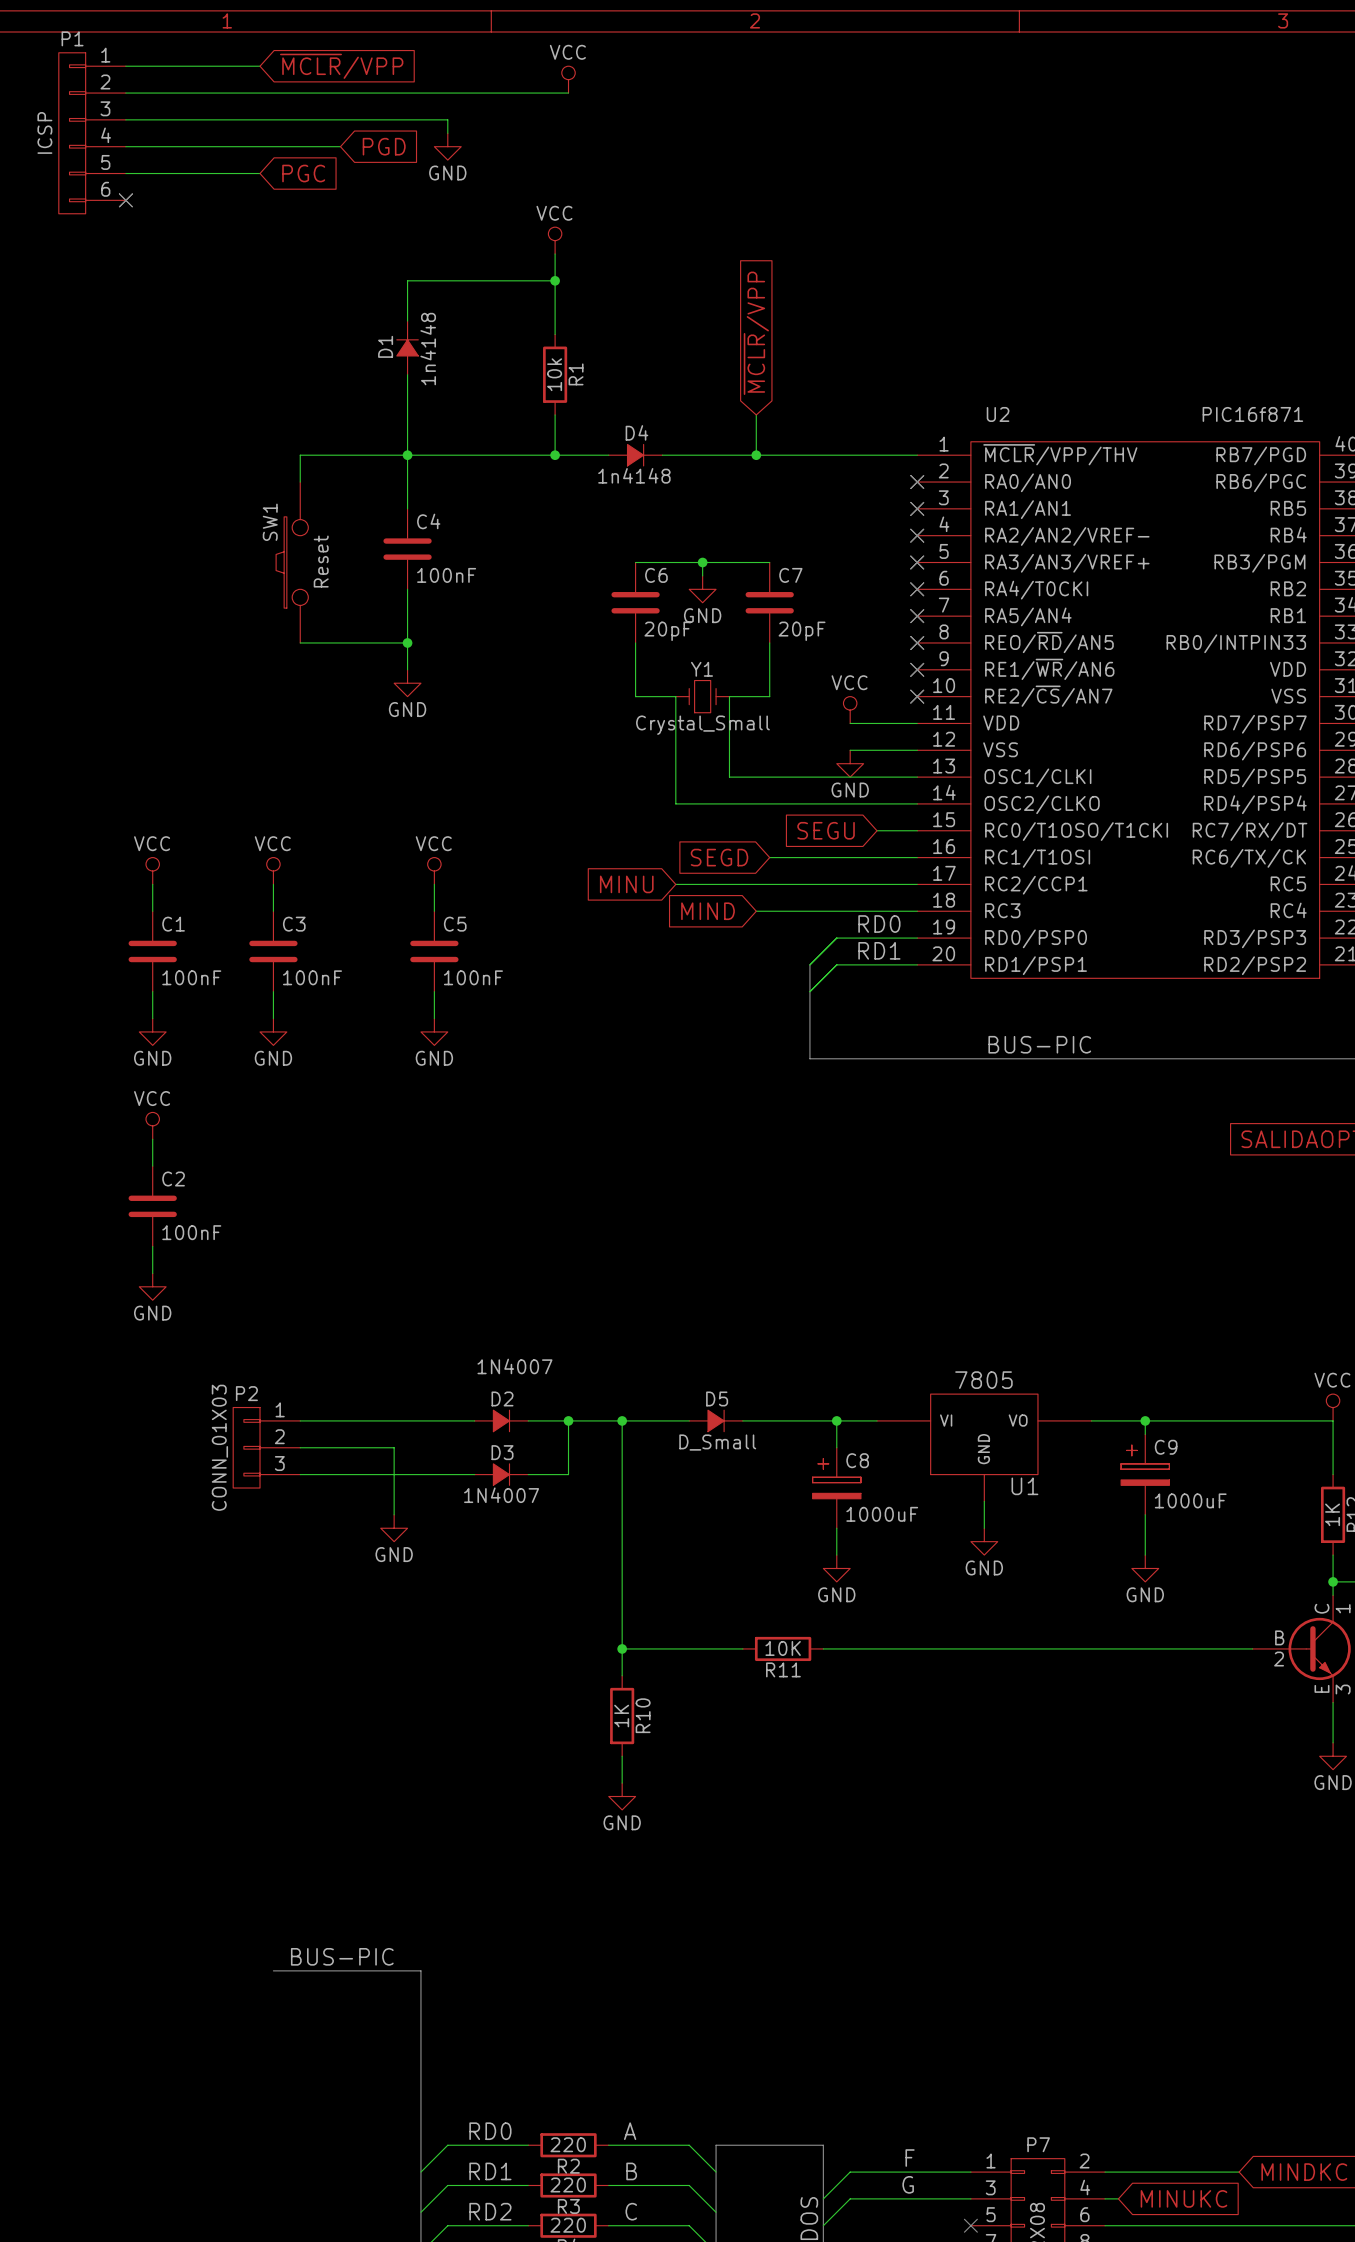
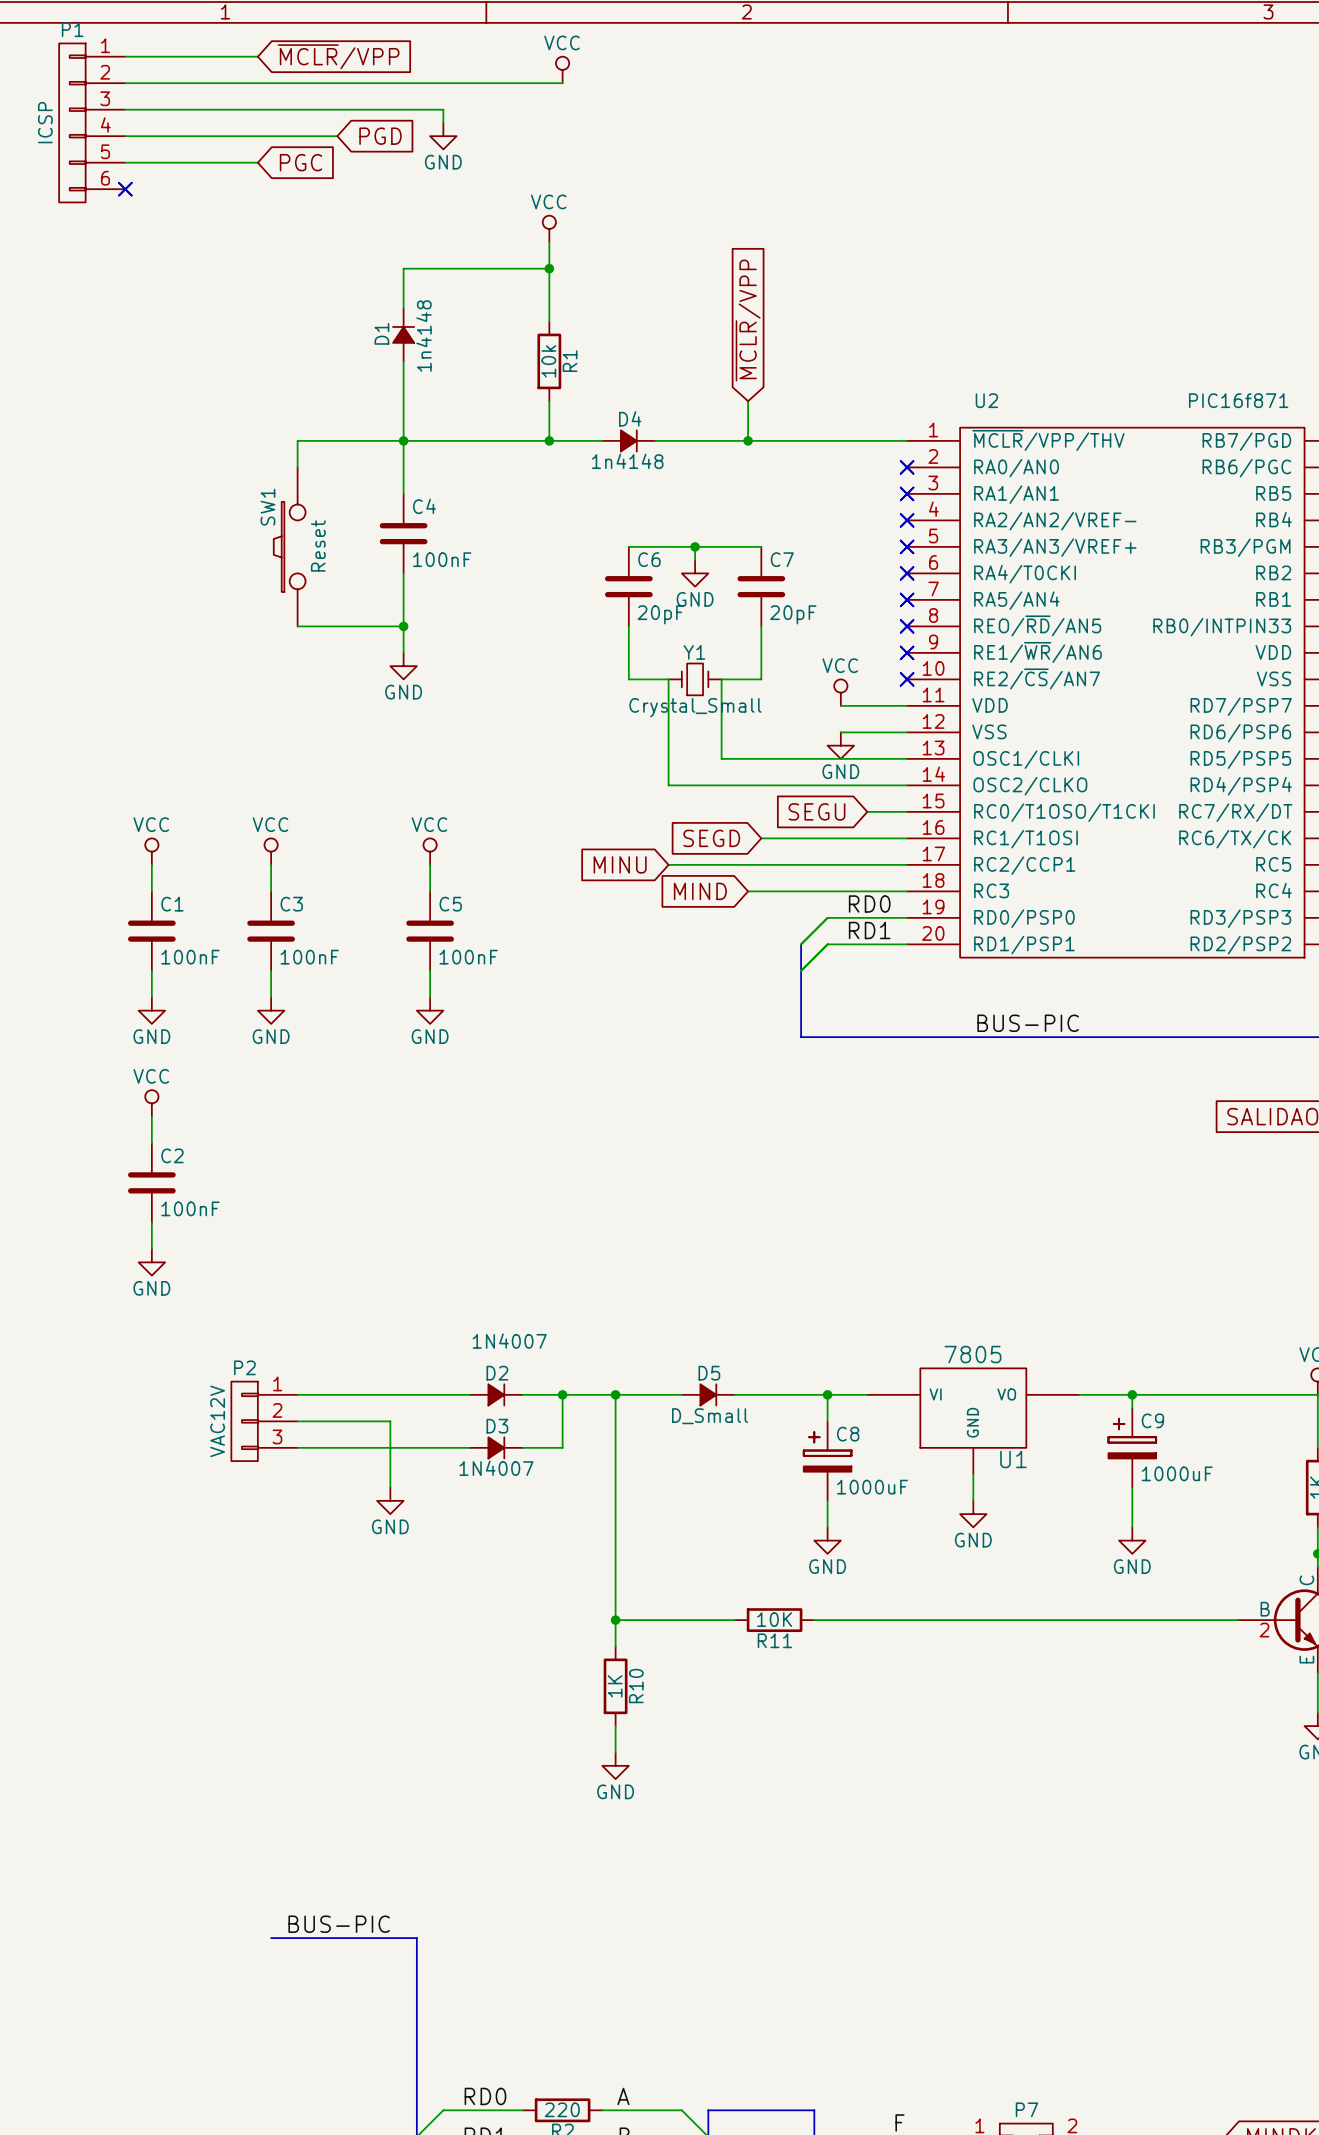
P2 value: CONN_01X03 (219, 1447) -> VAC12V (217, 1421)

